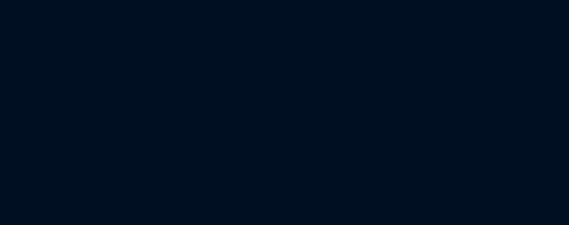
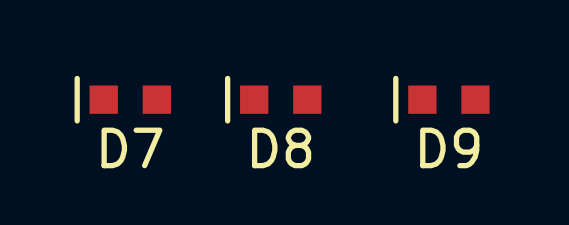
D7: none -> (122, 99)
D8: none -> (273, 99)
D9: none -> (441, 99)

